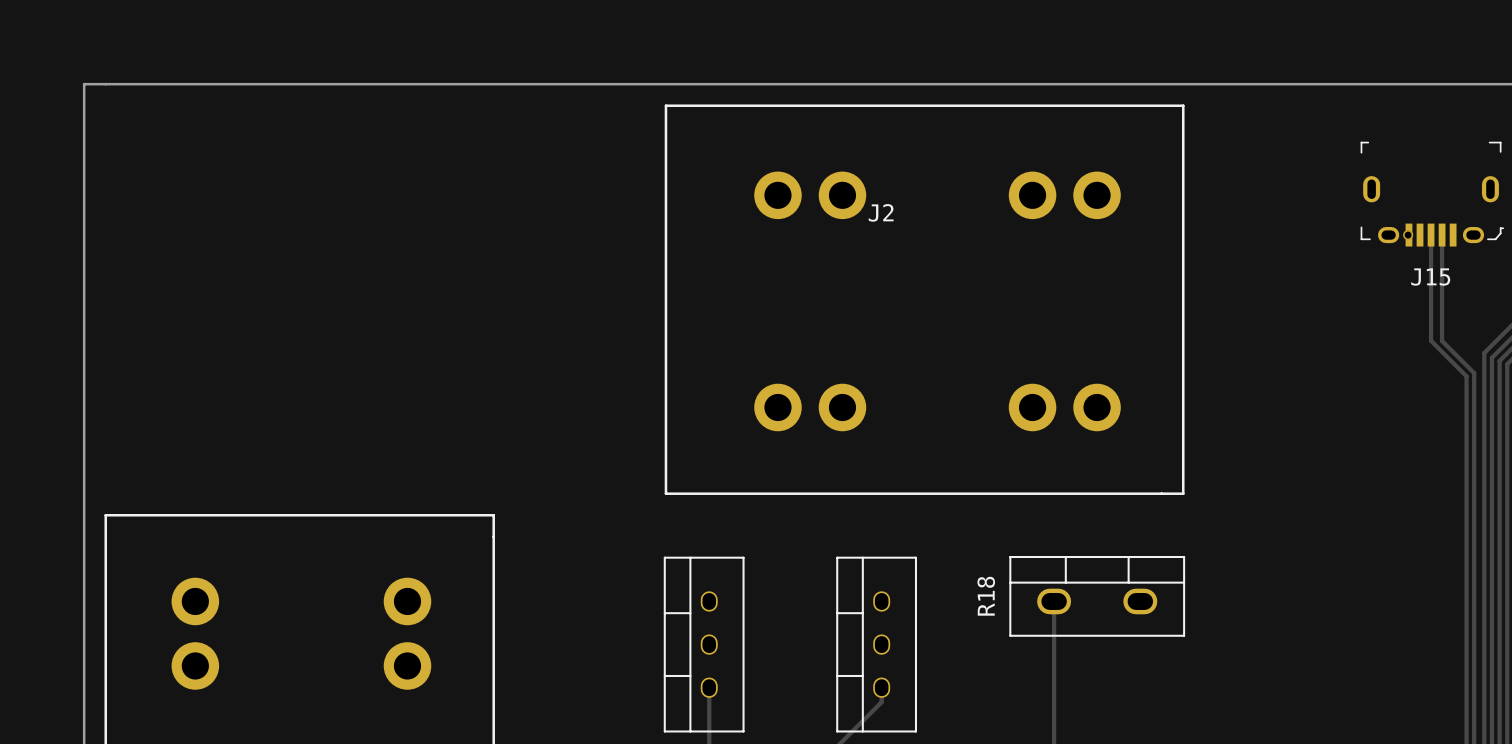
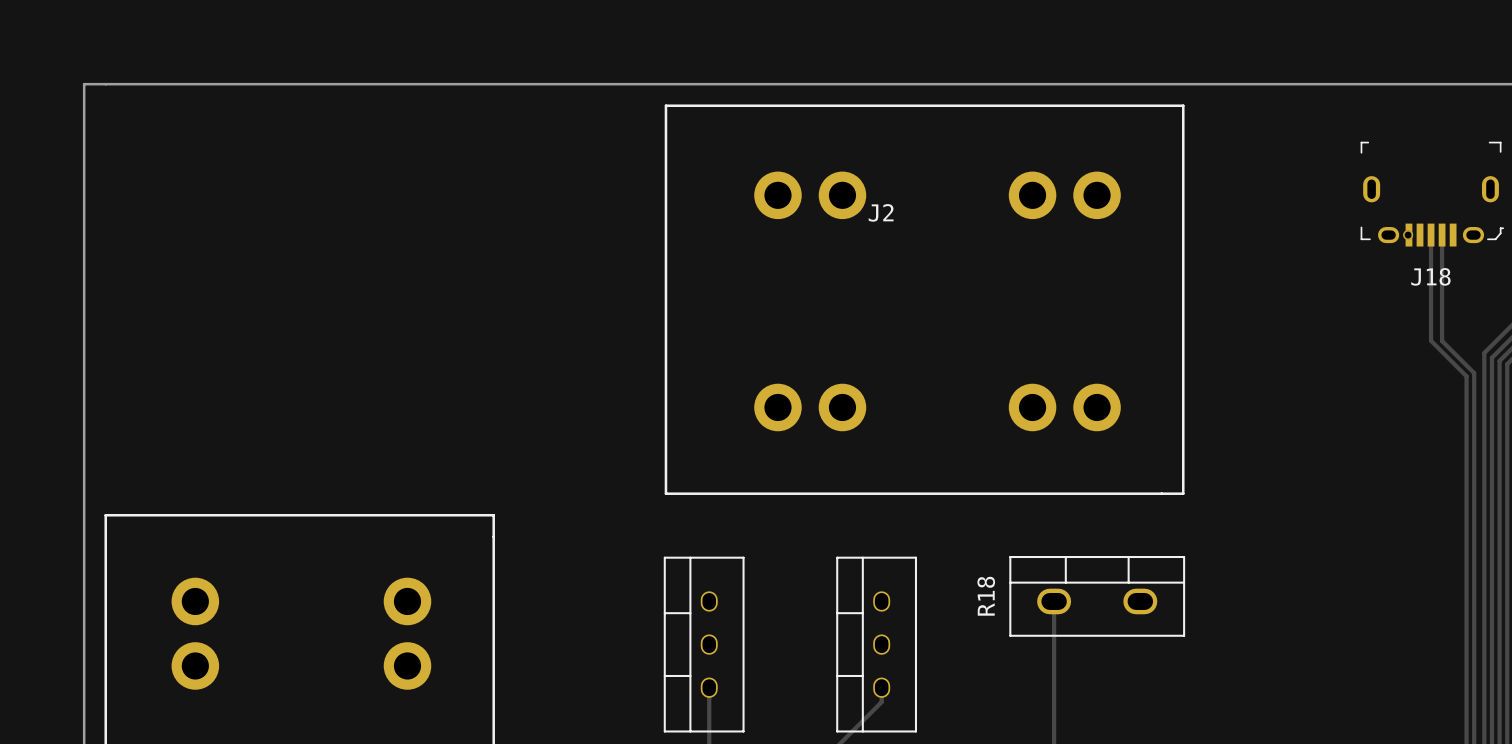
J15 name: J15 (1430, 277) -> J18 (1430, 276)

